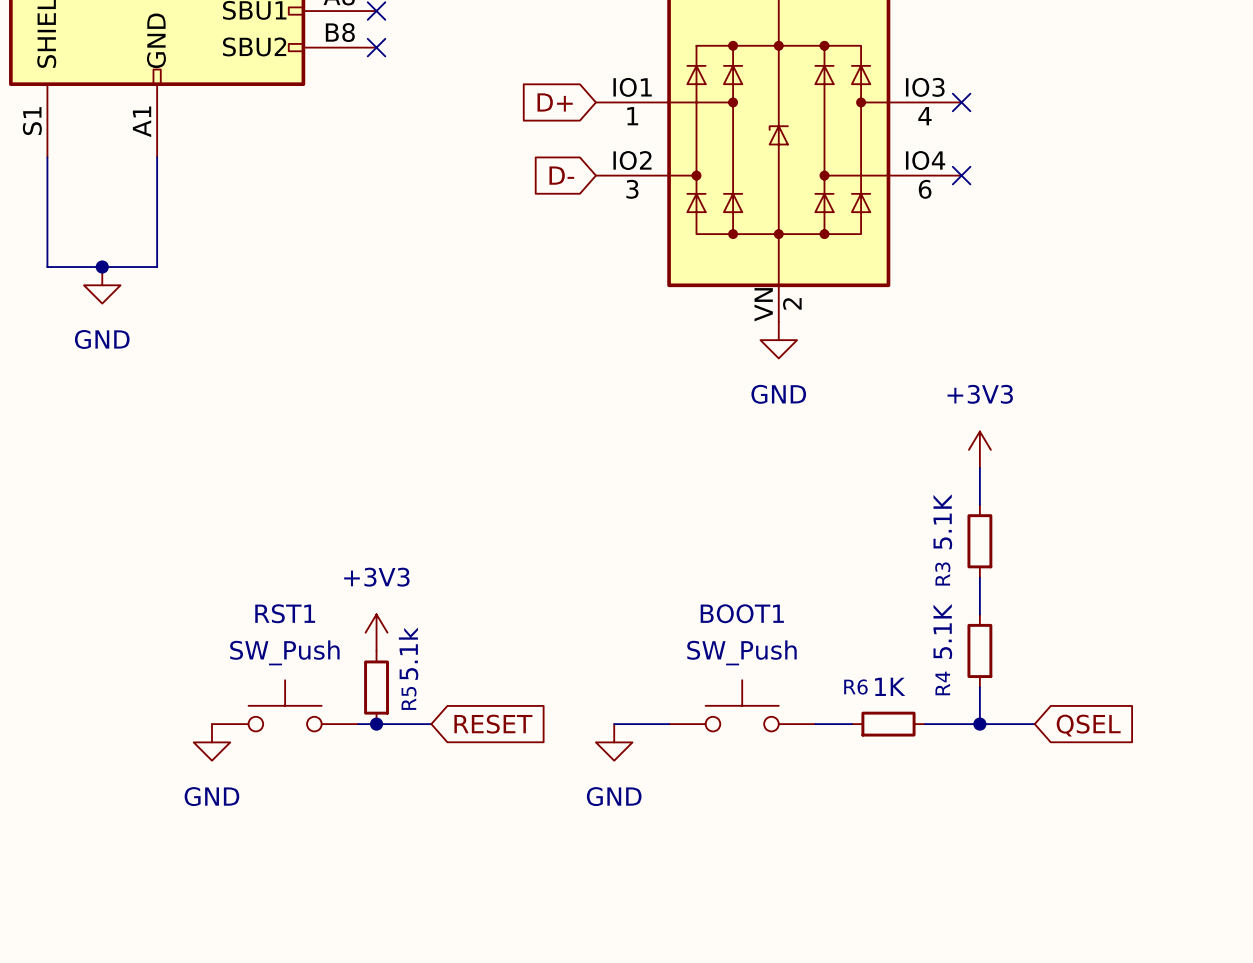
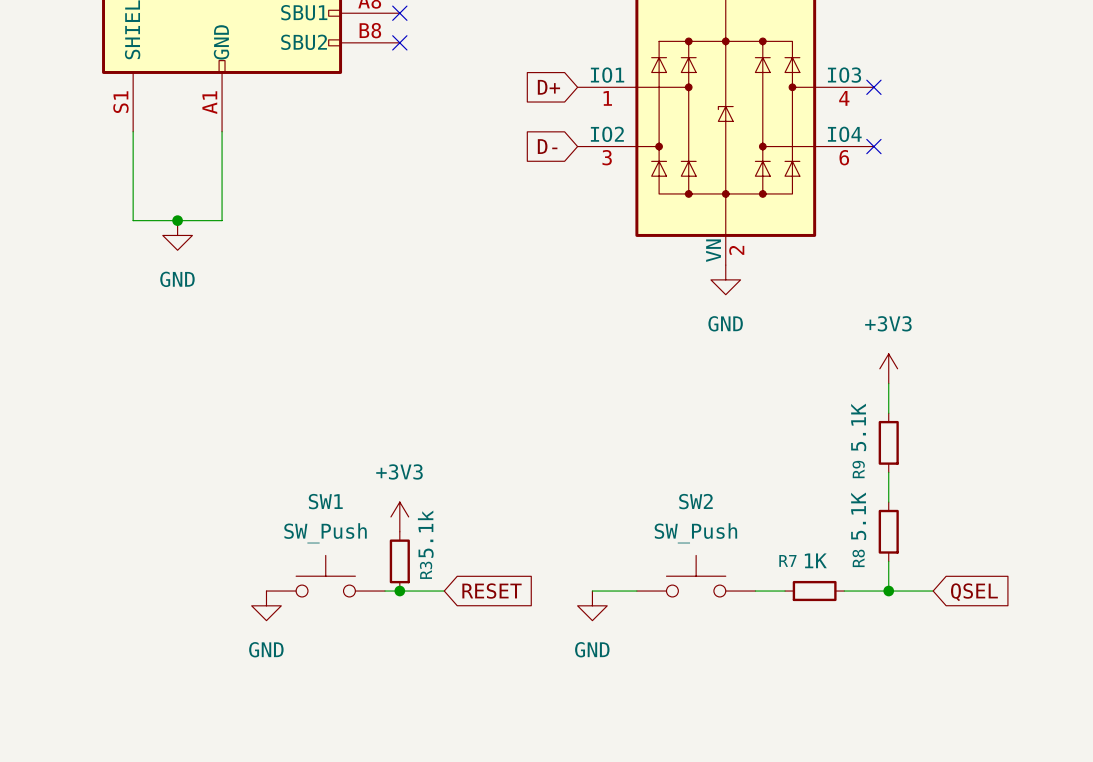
R3 name: R3 (942, 574) -> R9 (858, 469)
RST1 name: RST1 (285, 613) -> SW1 (325, 501)
BOOT1 name: BOOT1 (742, 613) -> SW2 (695, 501)
R4 name: R4 (942, 683) -> R8 (858, 558)
R6 name: R6 (855, 687) -> R7 (787, 560)
R5 name: R5 (409, 698) -> R3 (426, 570)

